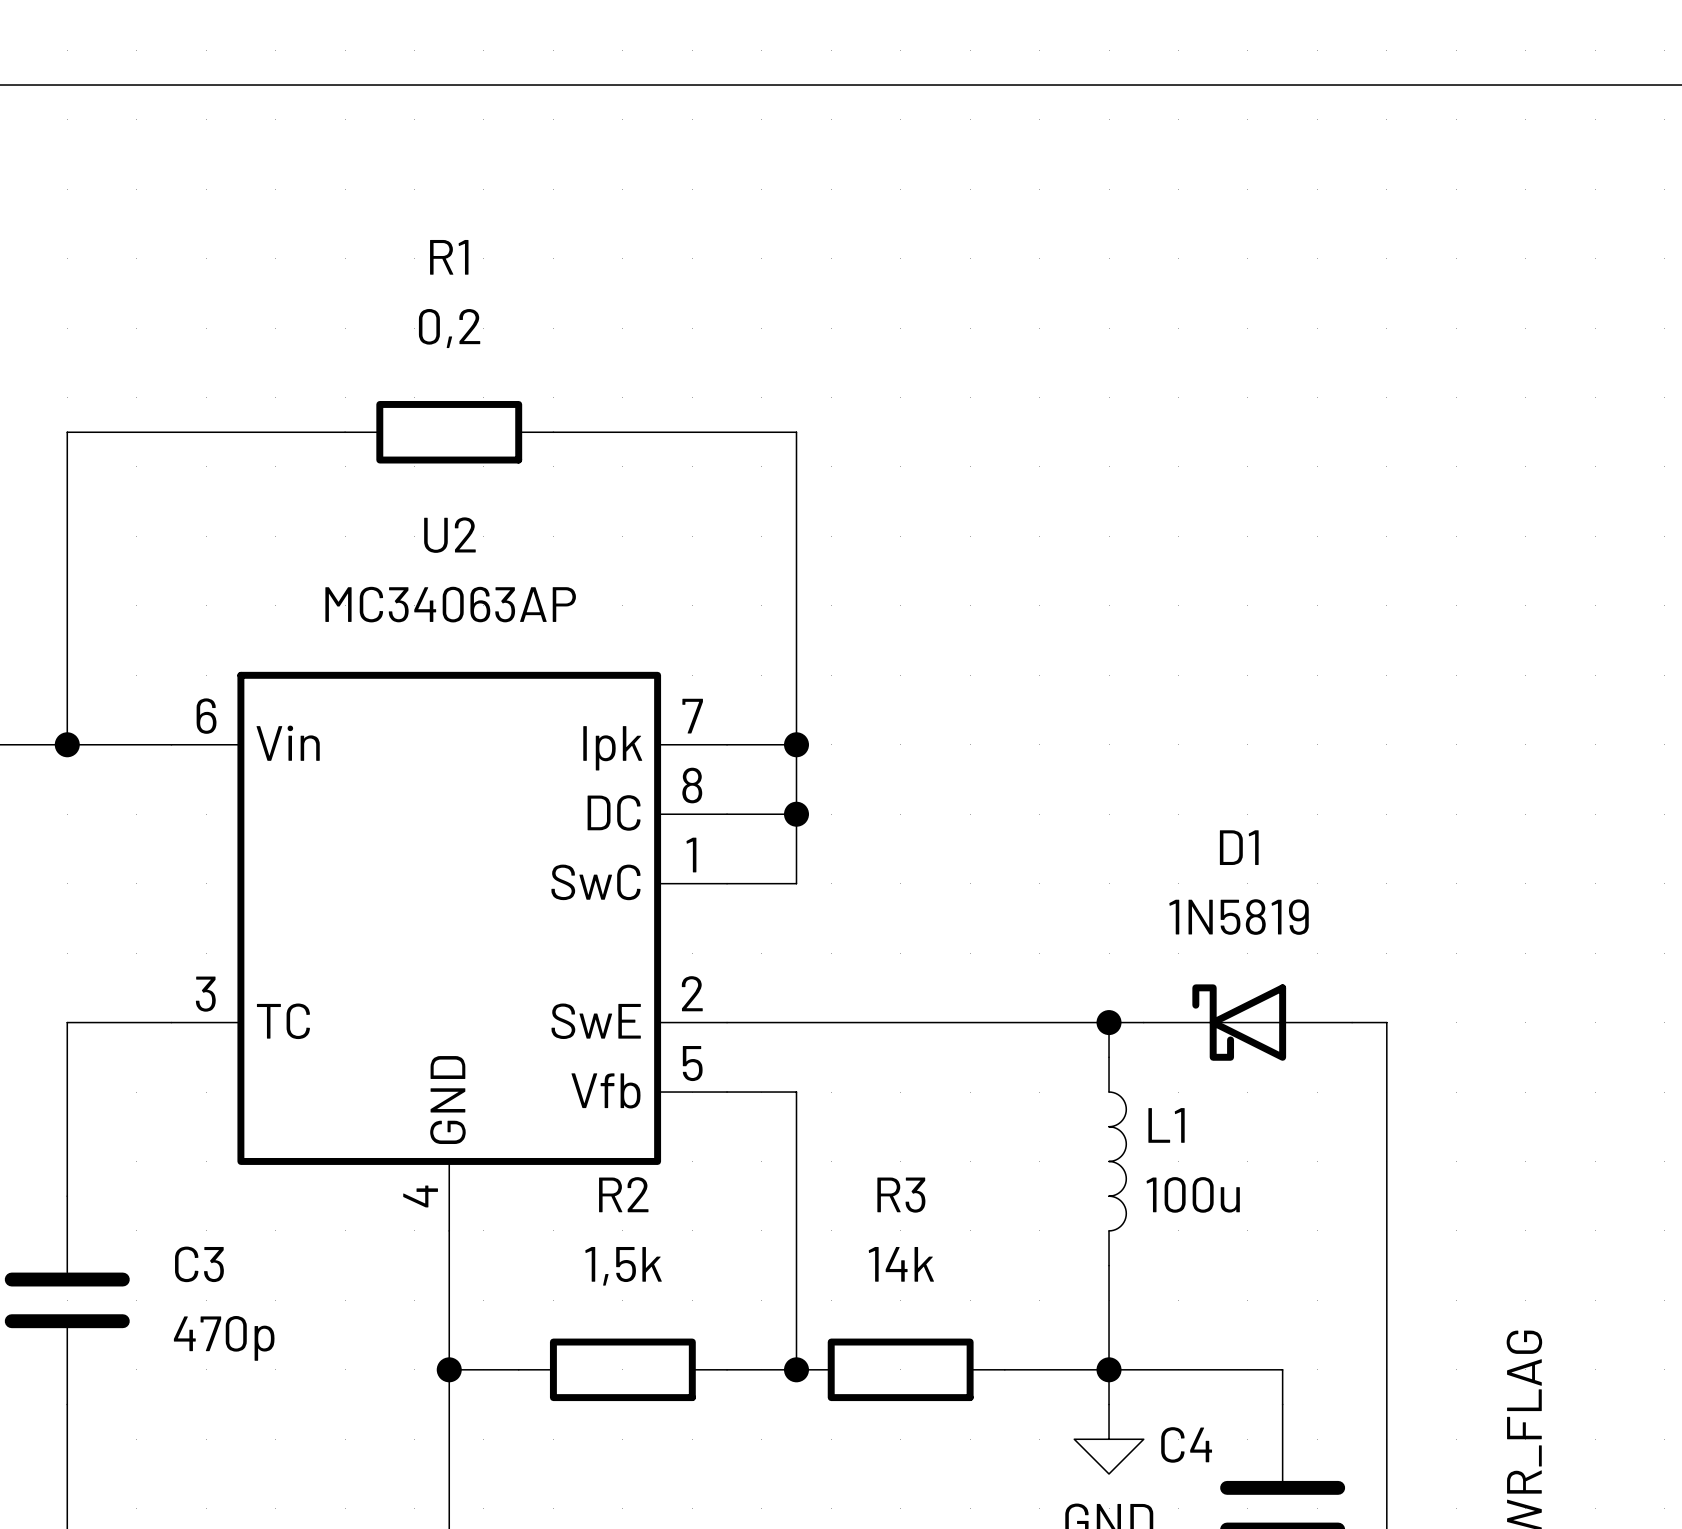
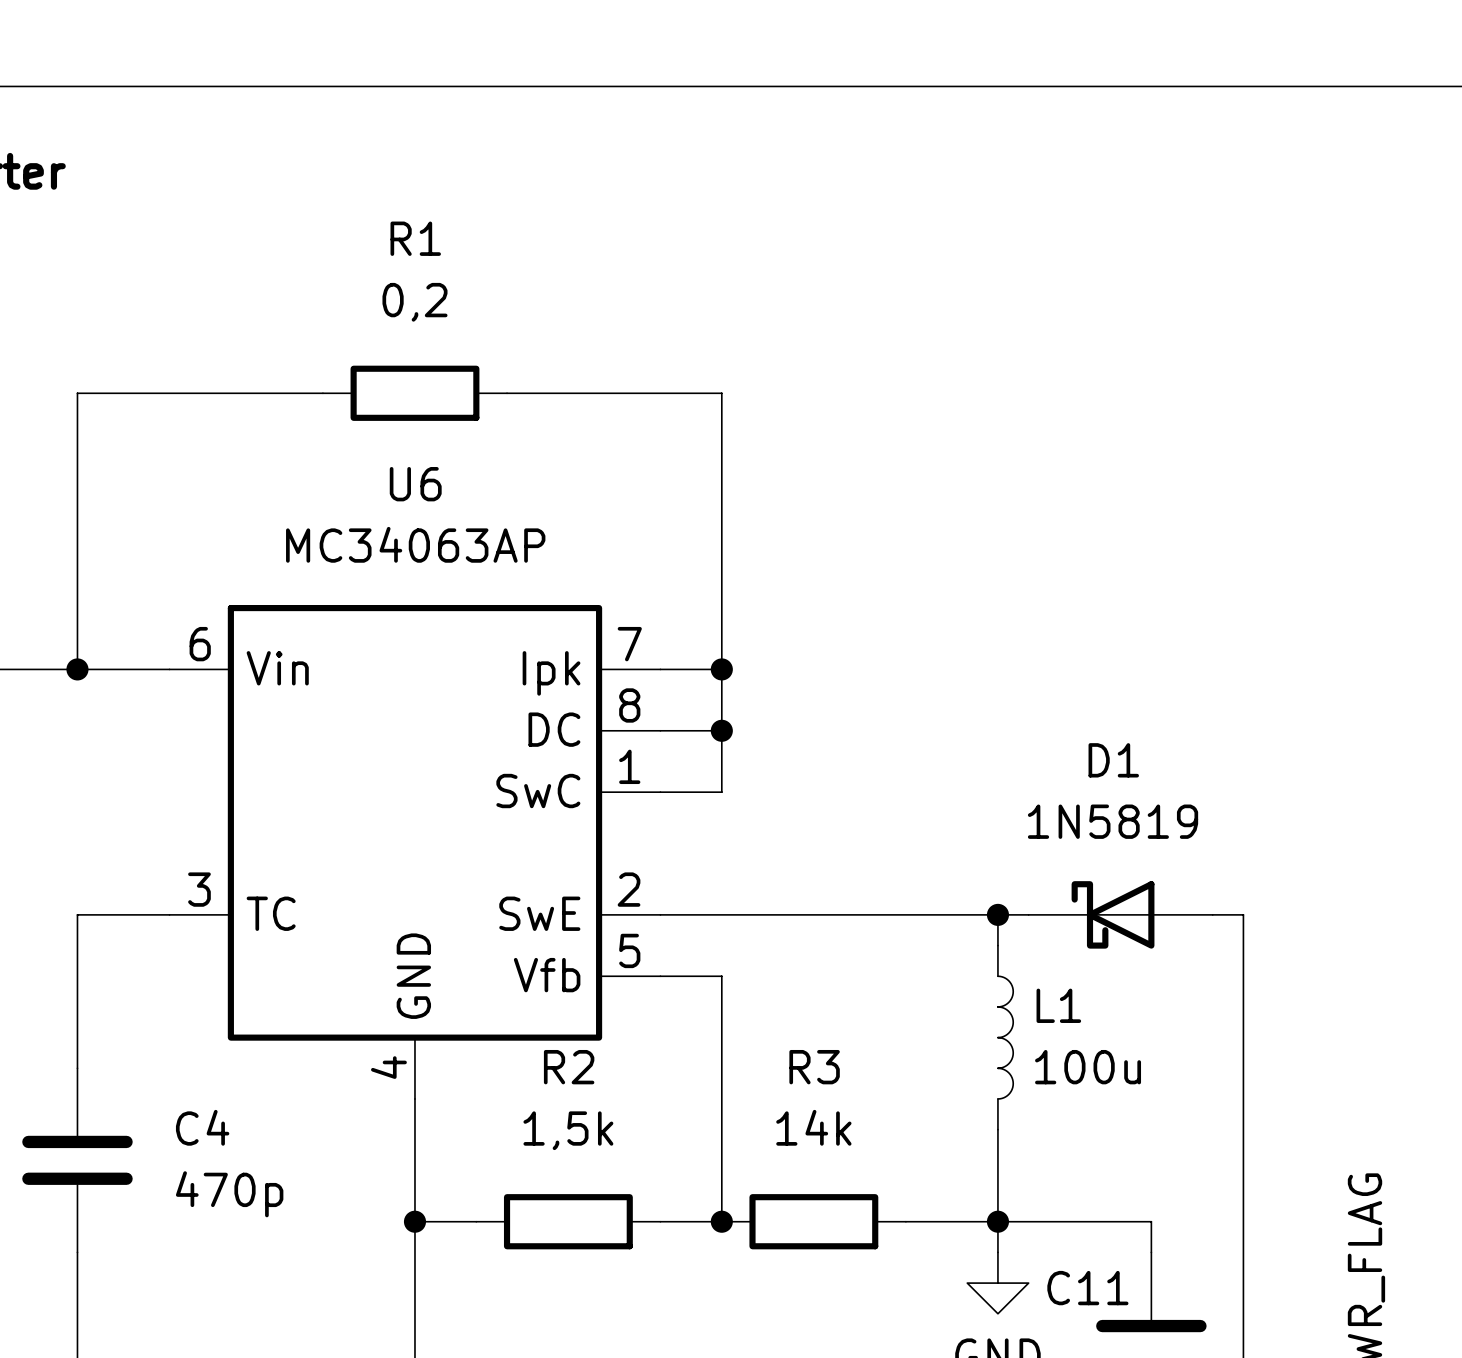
U2 name: U2 (449, 535) -> U6 (415, 484)
C3 name: C3 (199, 1264) -> C4 (202, 1127)
C4 name: C4 (1186, 1444) -> C11 (1087, 1288)

